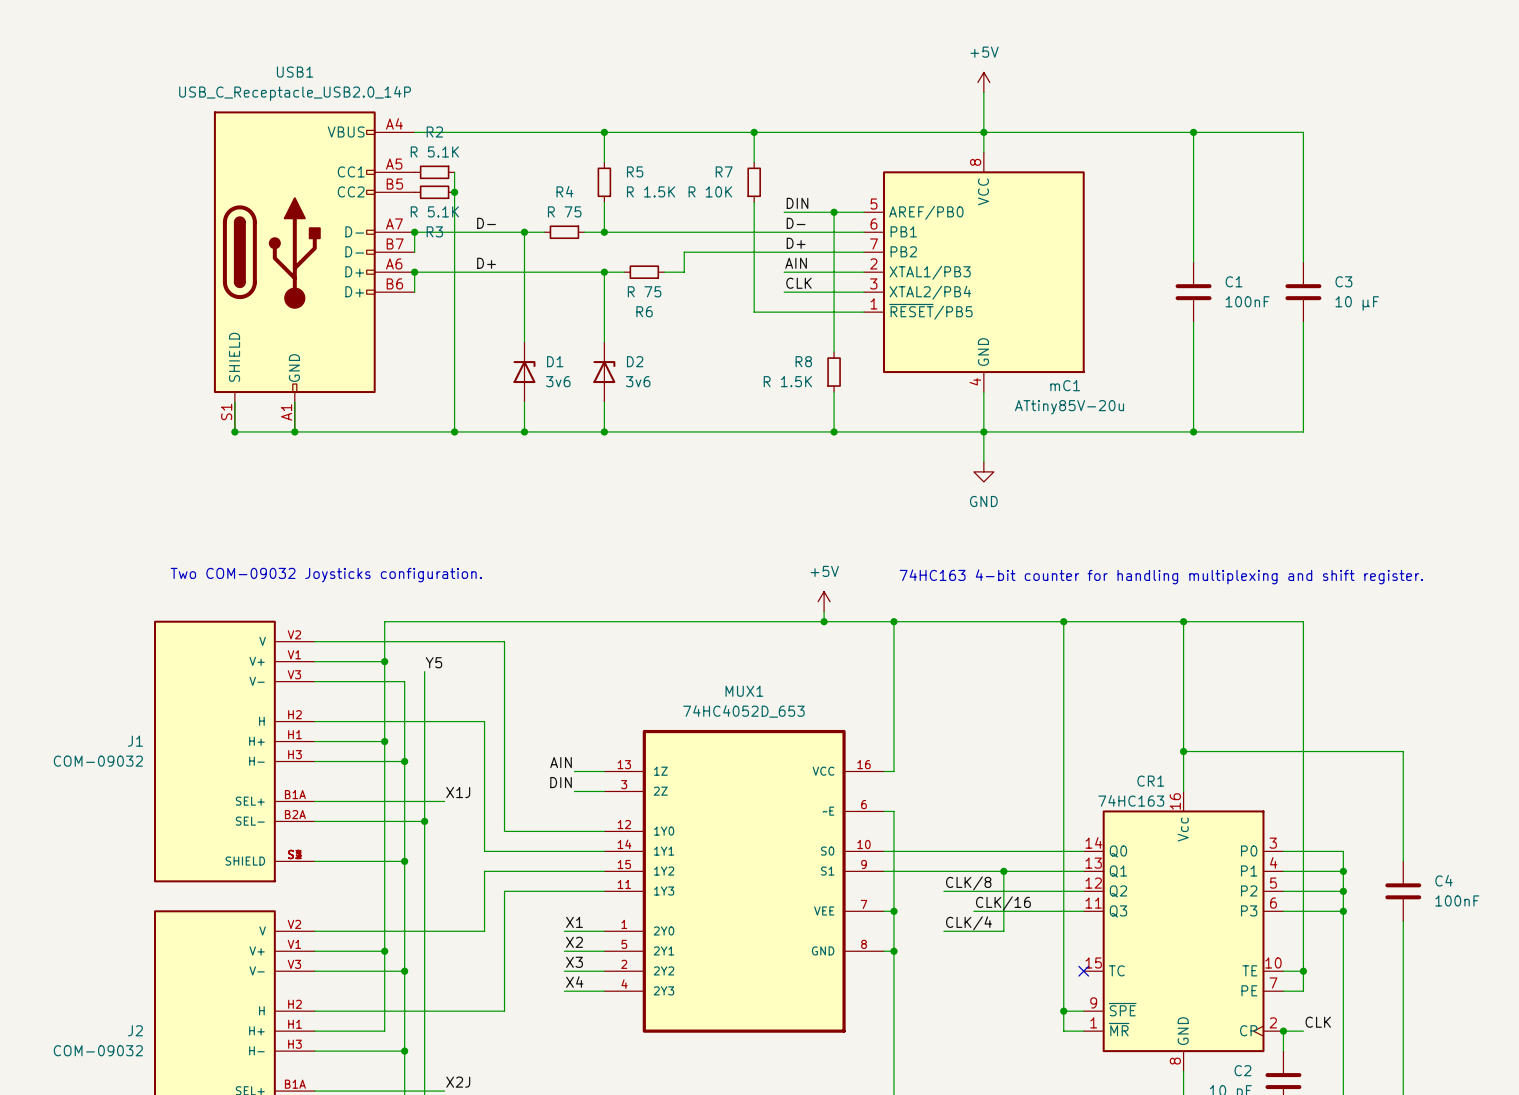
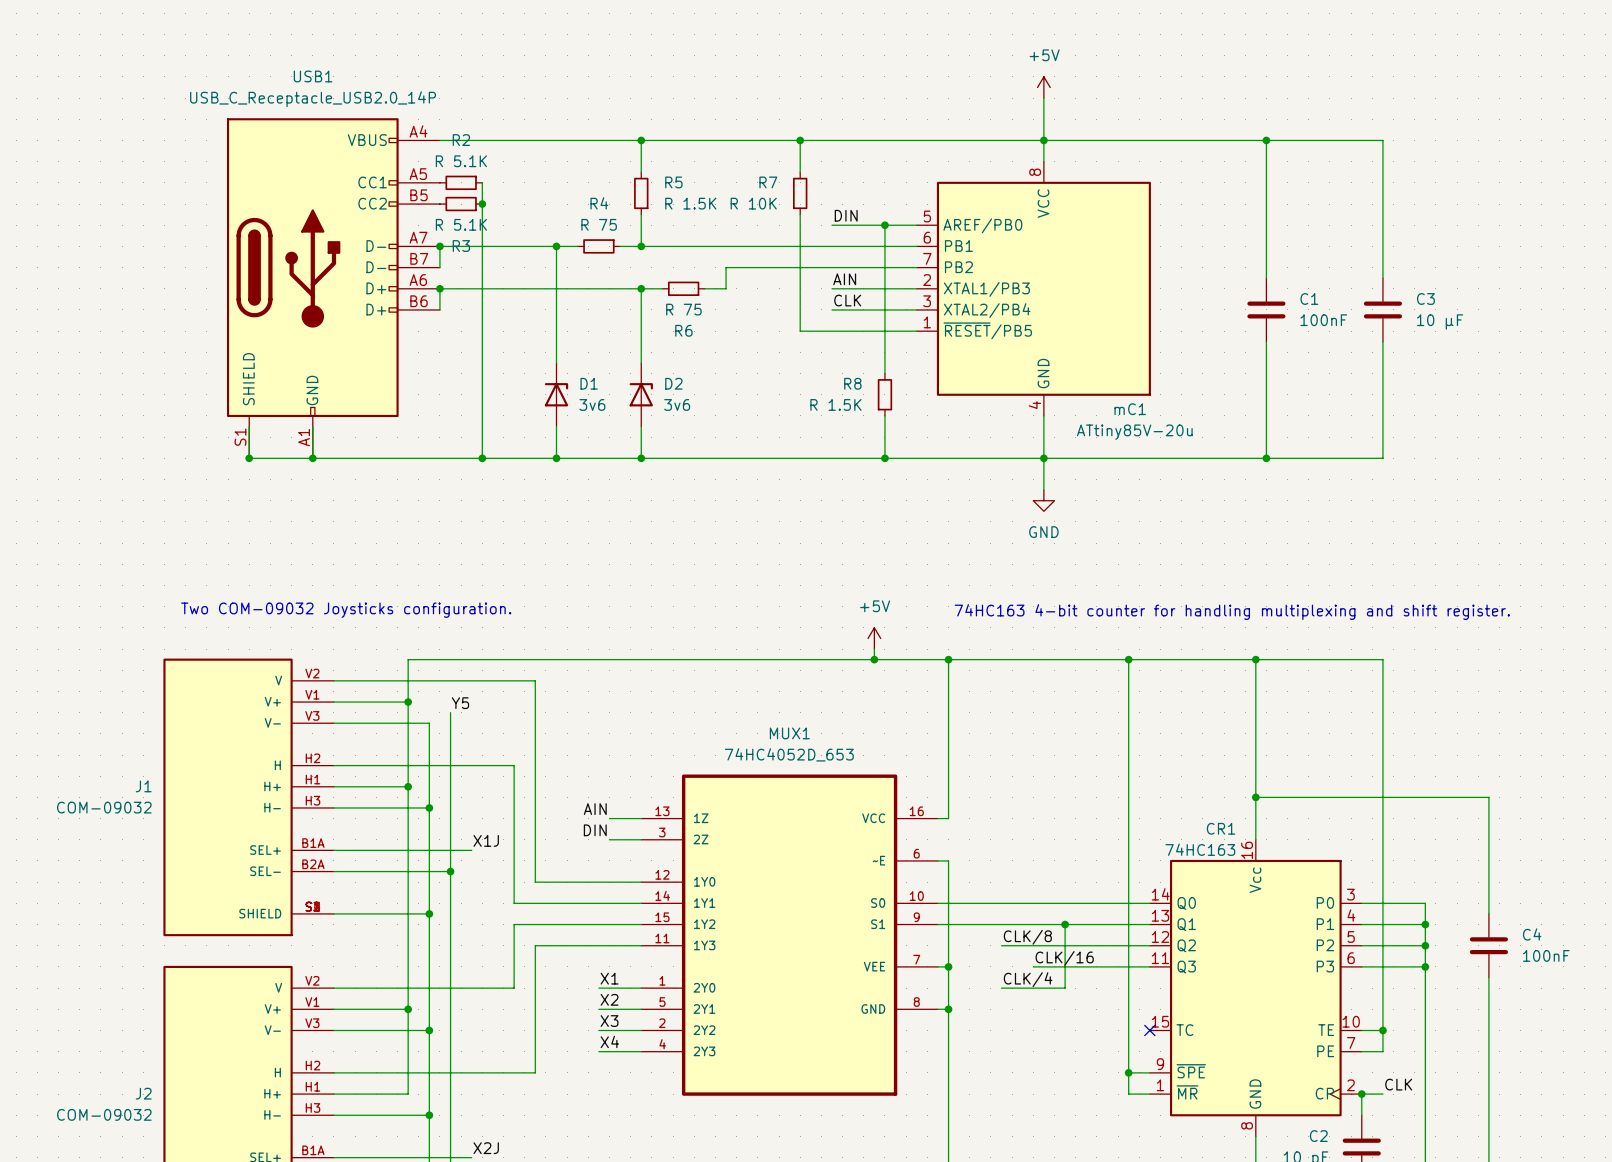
label: D- (486, 223) -> none
label: D- (796, 223) -> none
label: D+ (796, 243) -> none
label: D+ (486, 263) -> none

